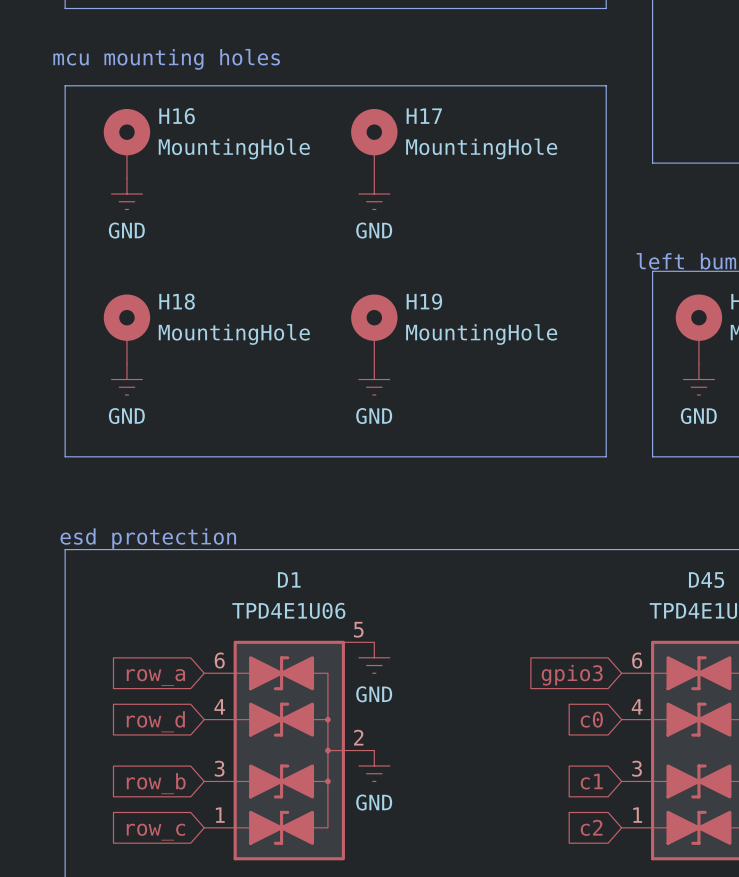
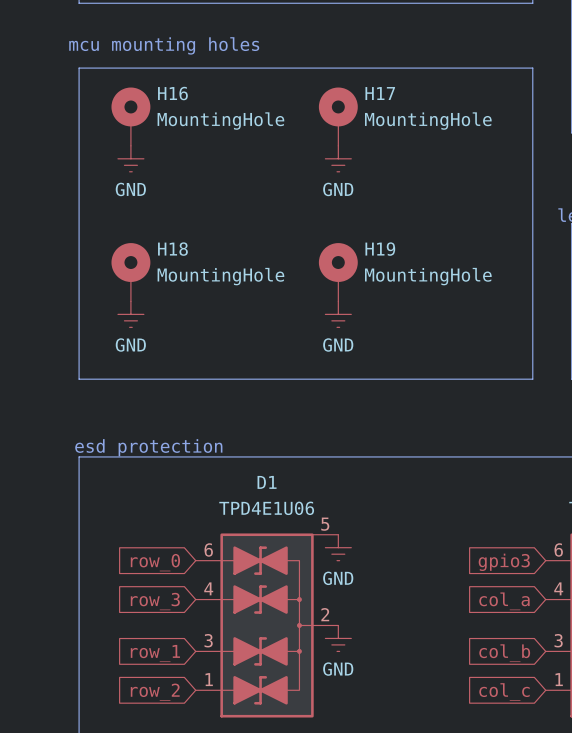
global label: row_a (155, 677) -> row_0 (155, 562)
global label: c0 (591, 719) -> col_a (504, 601)
global label: row_d (155, 721) -> row_3 (155, 601)
global label: c1 (591, 781) -> col_b (504, 653)
global label: row_b (156, 783) -> row_1 (155, 653)
global label: c2 (591, 827) -> col_c (504, 692)
global label: row_c (155, 832) -> row_2 (155, 692)

